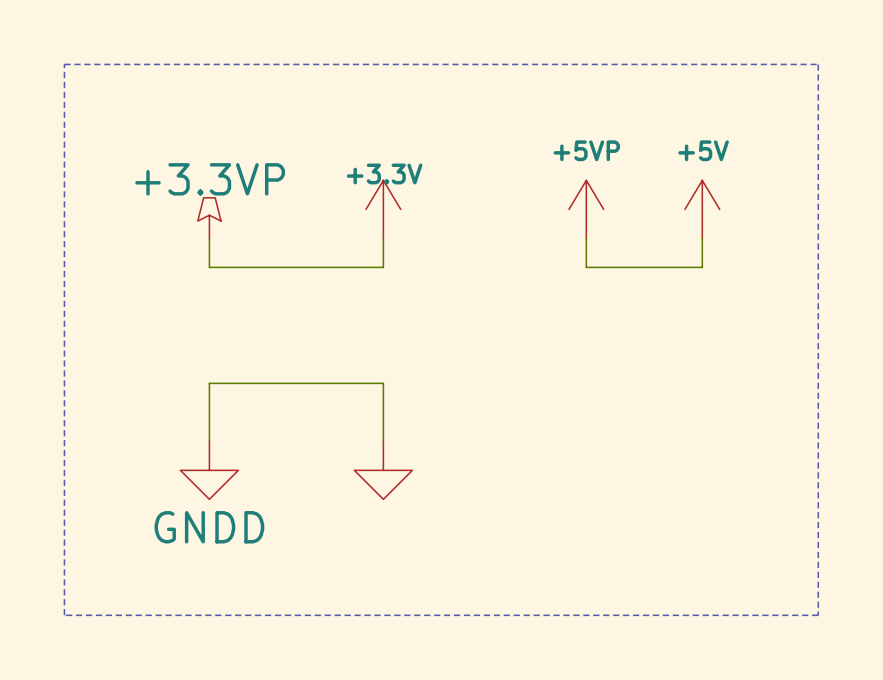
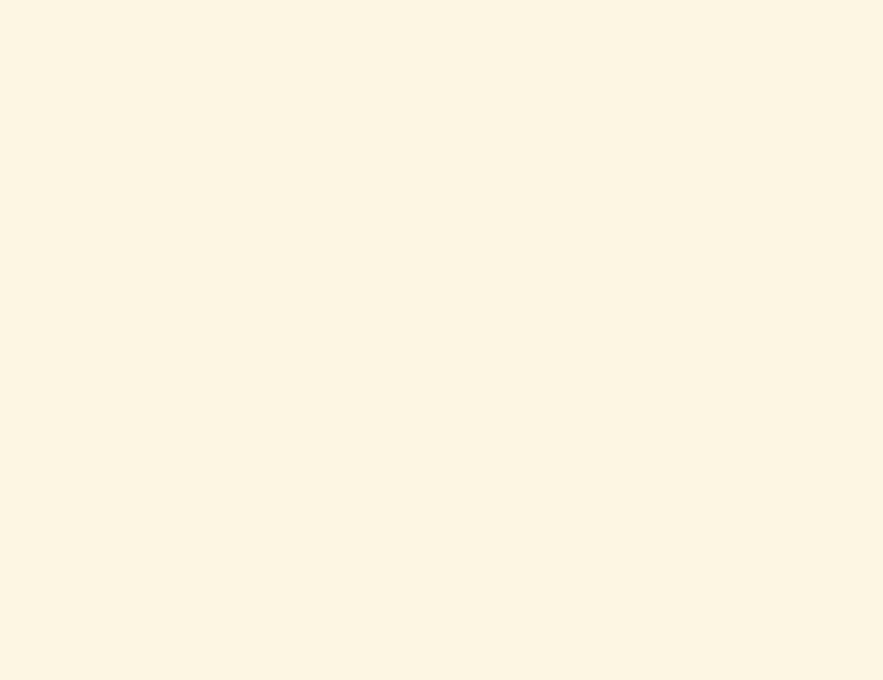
line: (64, 64) (818, 64) (818, 615) (64, 615) (64, 64) -> none
power symbol: +3.3V (383, 209) -> none
power symbol: +5VP (586, 209) -> none
power symbol: +5V (702, 209) -> none
power symbol: +3.3VP (209, 218) -> none
wire: (209, 238) (209, 267) (383, 267) (383, 238) -> none
wire: (586, 238) (586, 267) (702, 267) (702, 238) -> none
wire: (209, 441) (209, 383) (383, 383) (383, 441) -> none
power symbol: GNDD (209, 470) -> none
power symbol: (383, 470) -> none

